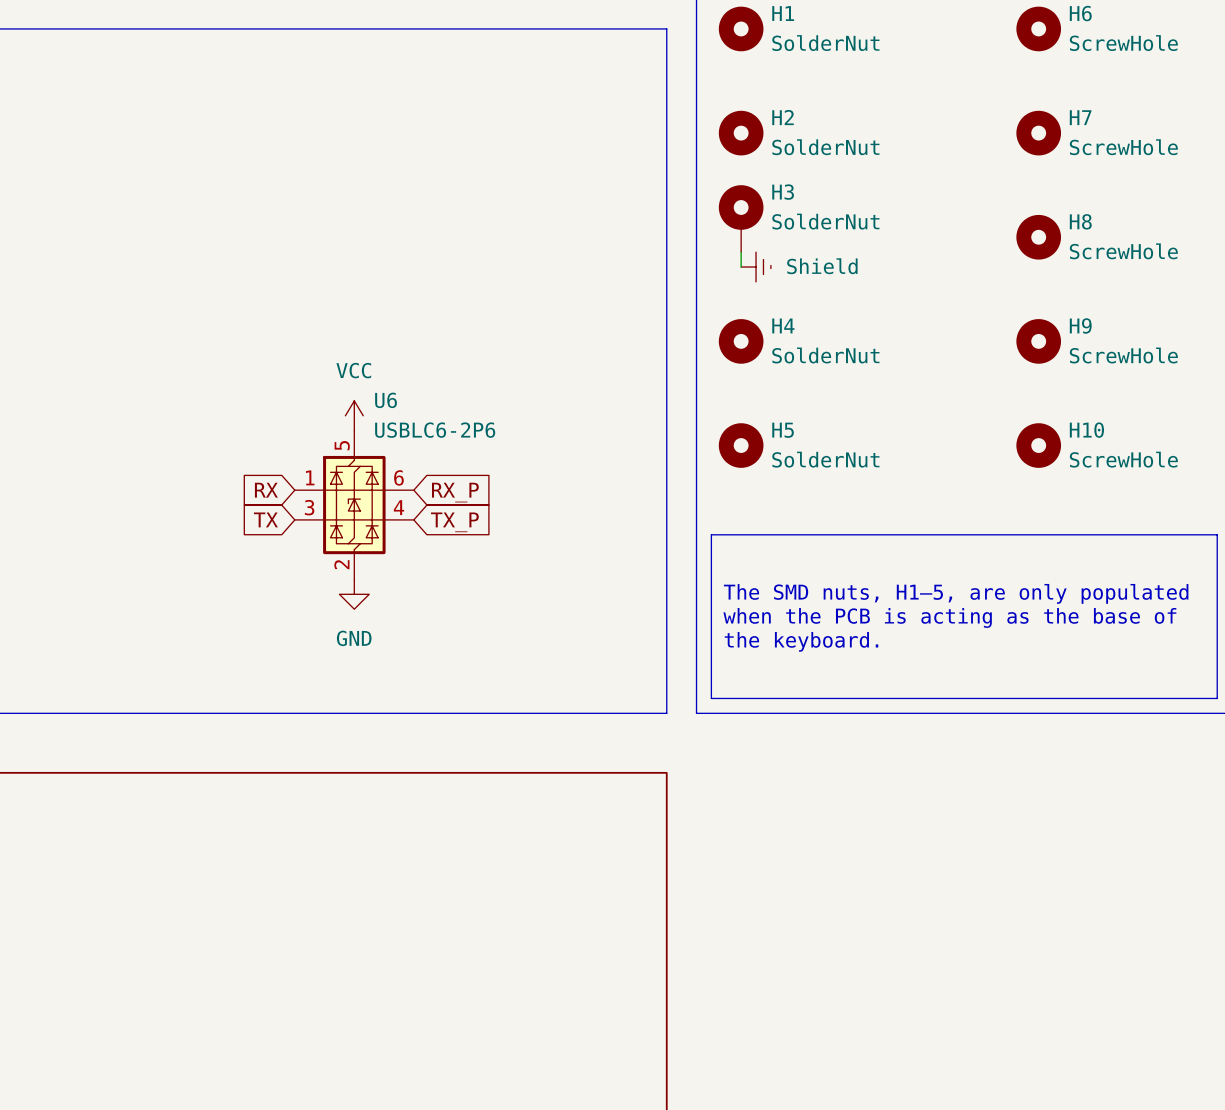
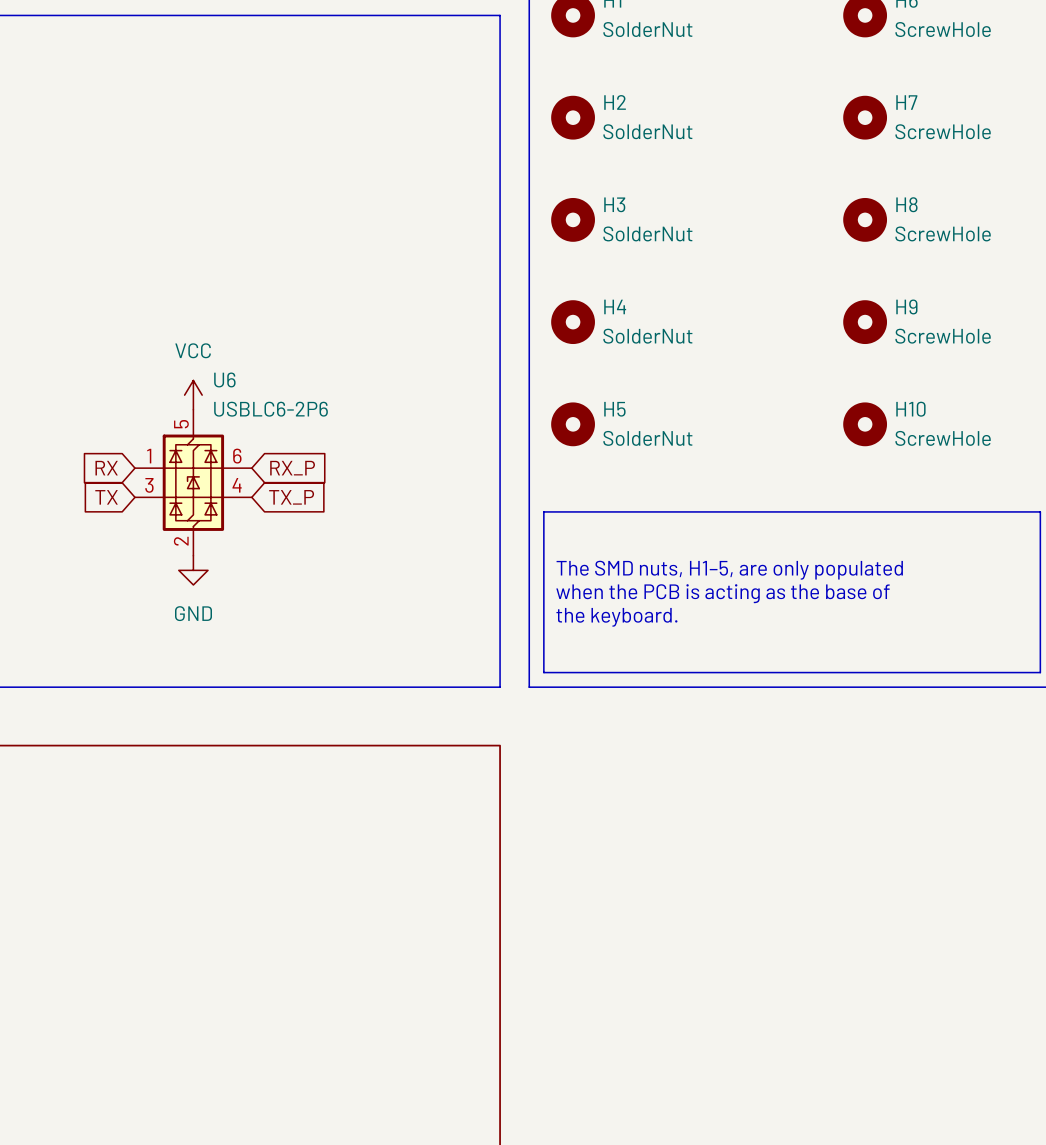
H3 symbol: [718, 185, 764, 253] -> [551, 197, 595, 242]
wire: (741, 252) (741, 267) -> none
power symbol: Shield (756, 267) -> none

